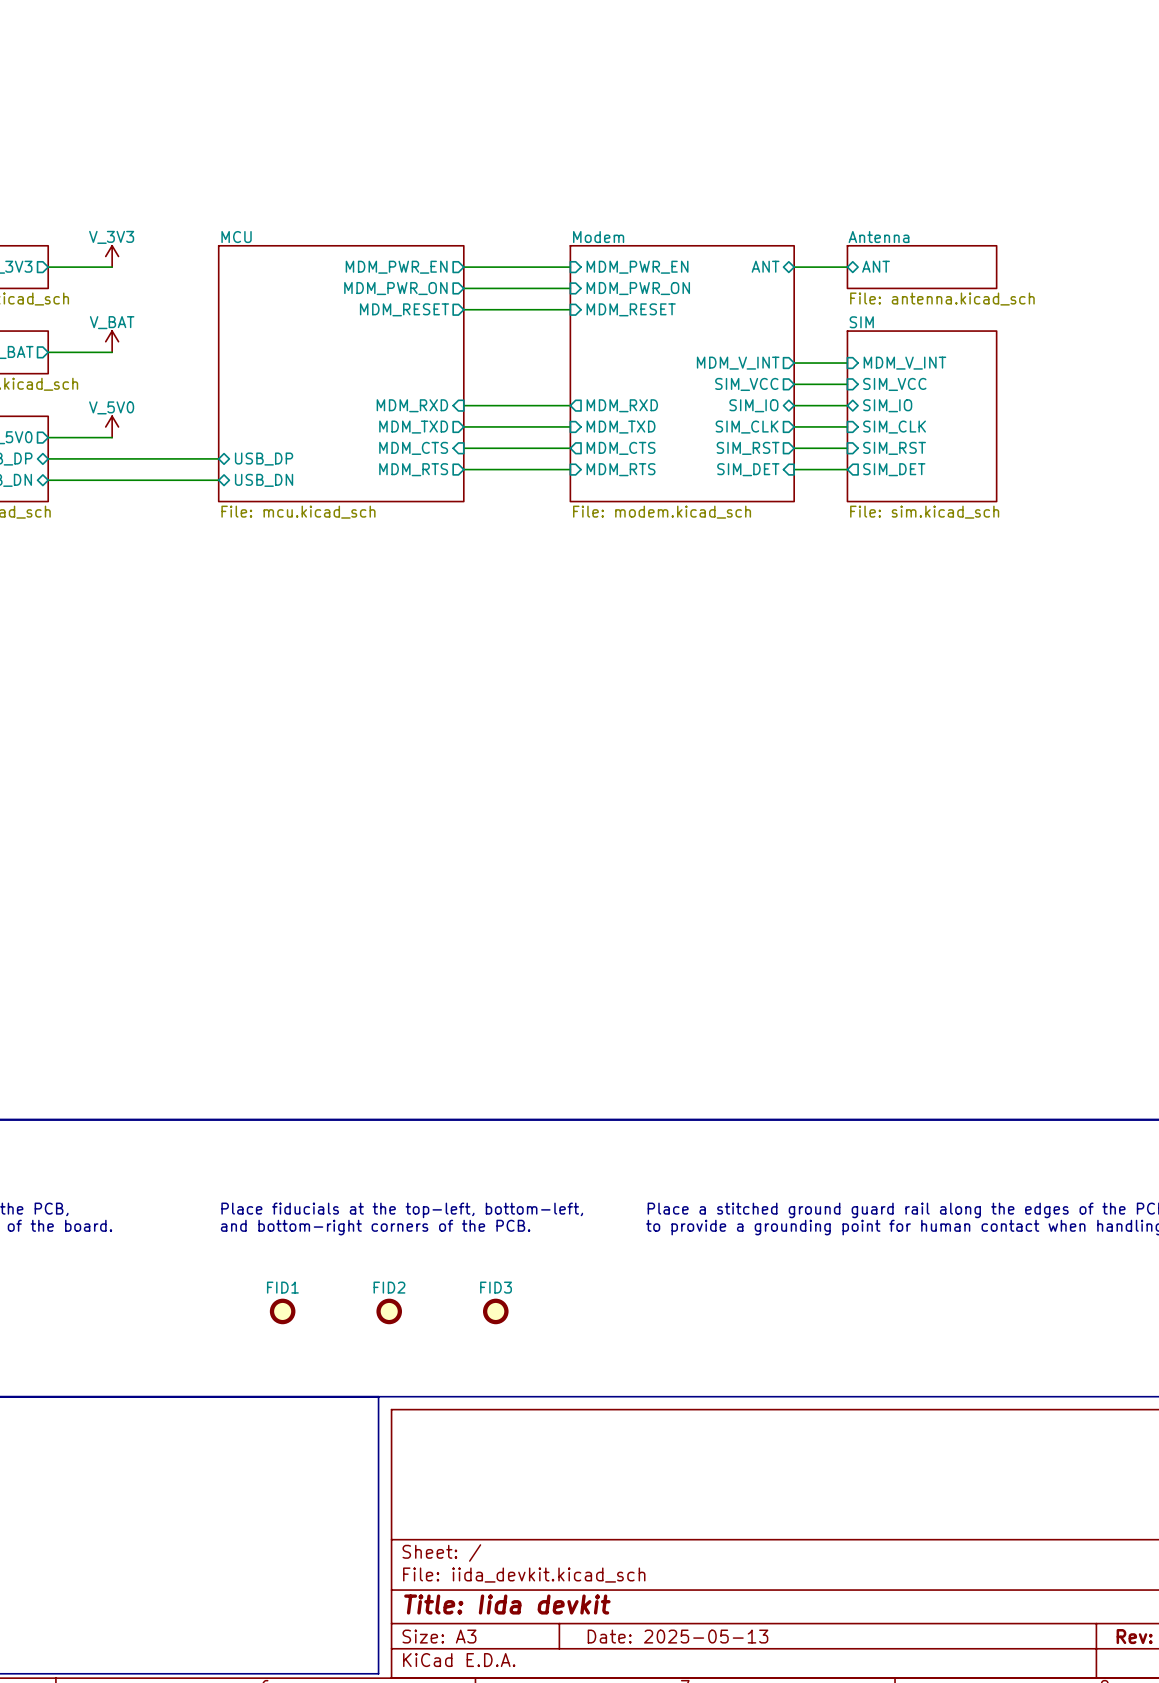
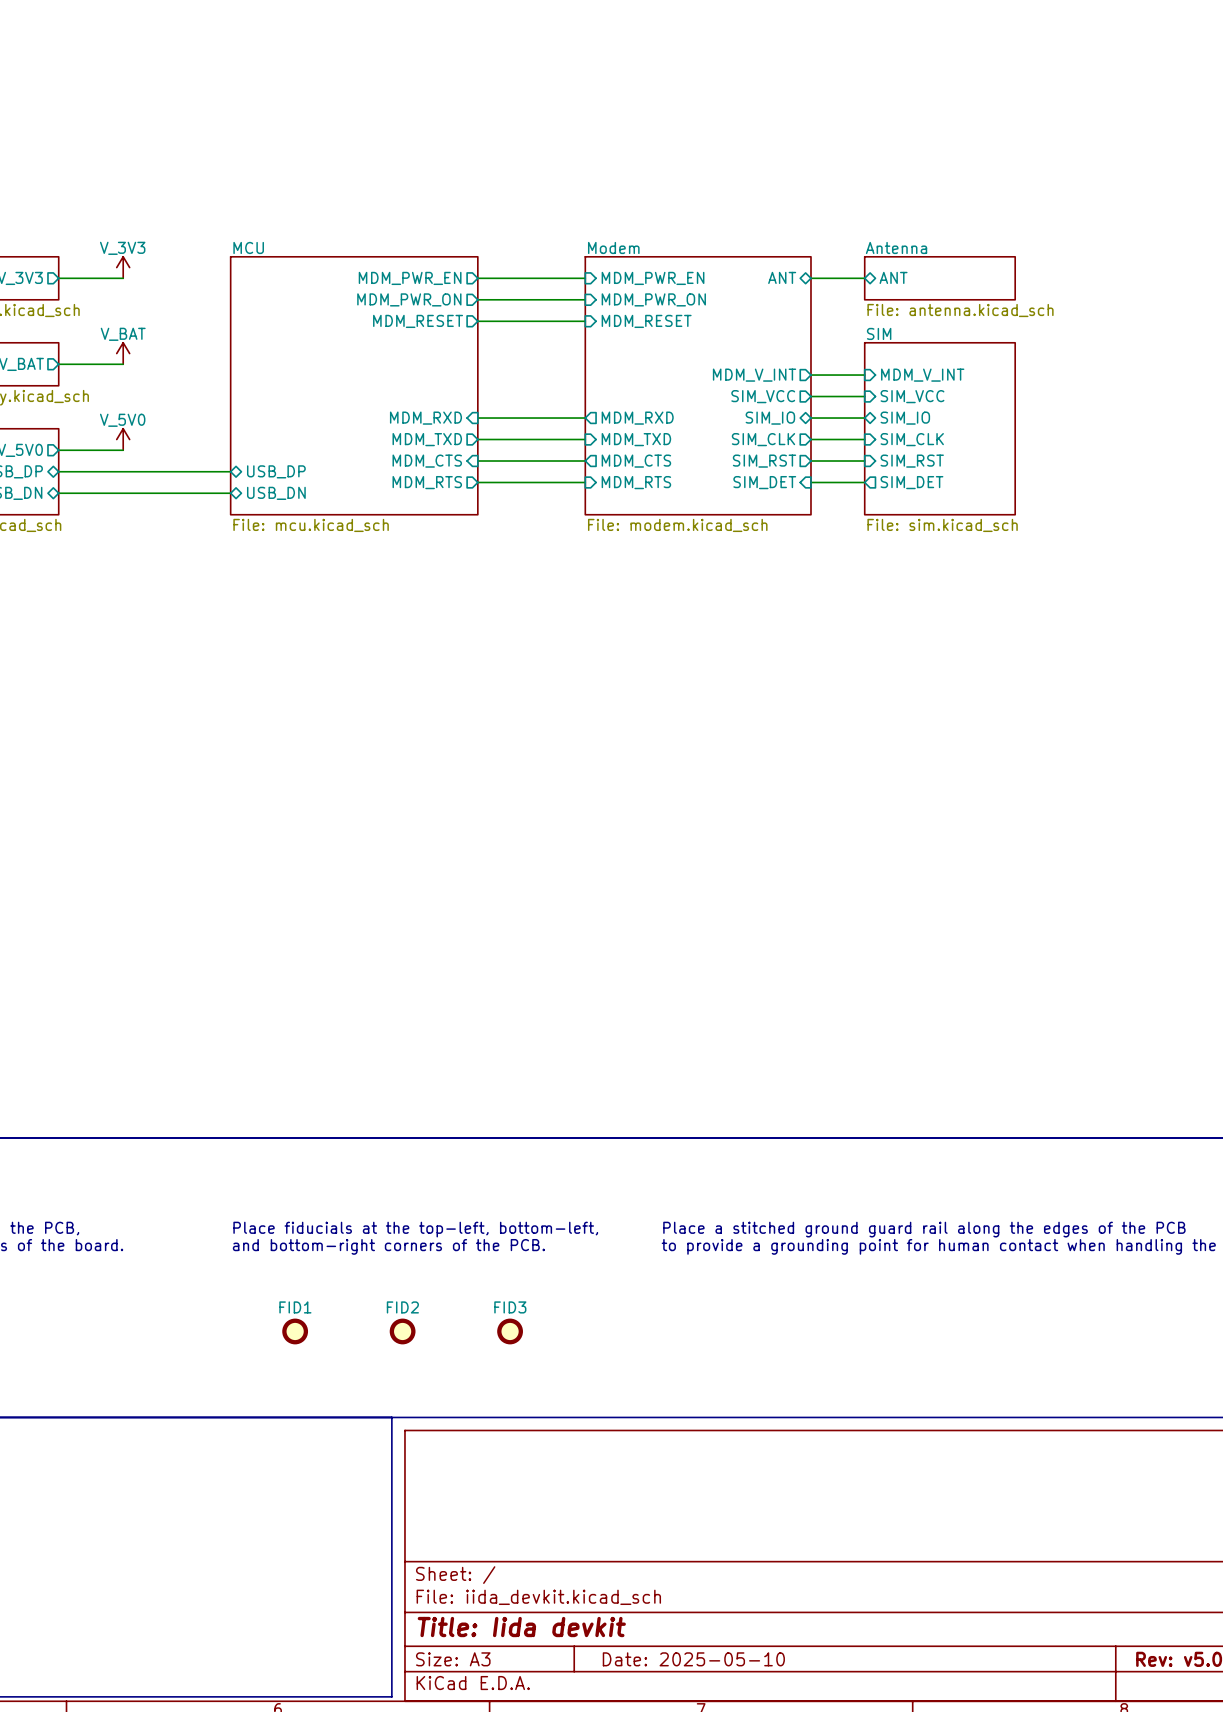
title block: Date: 2025-05-13 (677, 1636) -> Date: 2025-05-10 (693, 1659)

